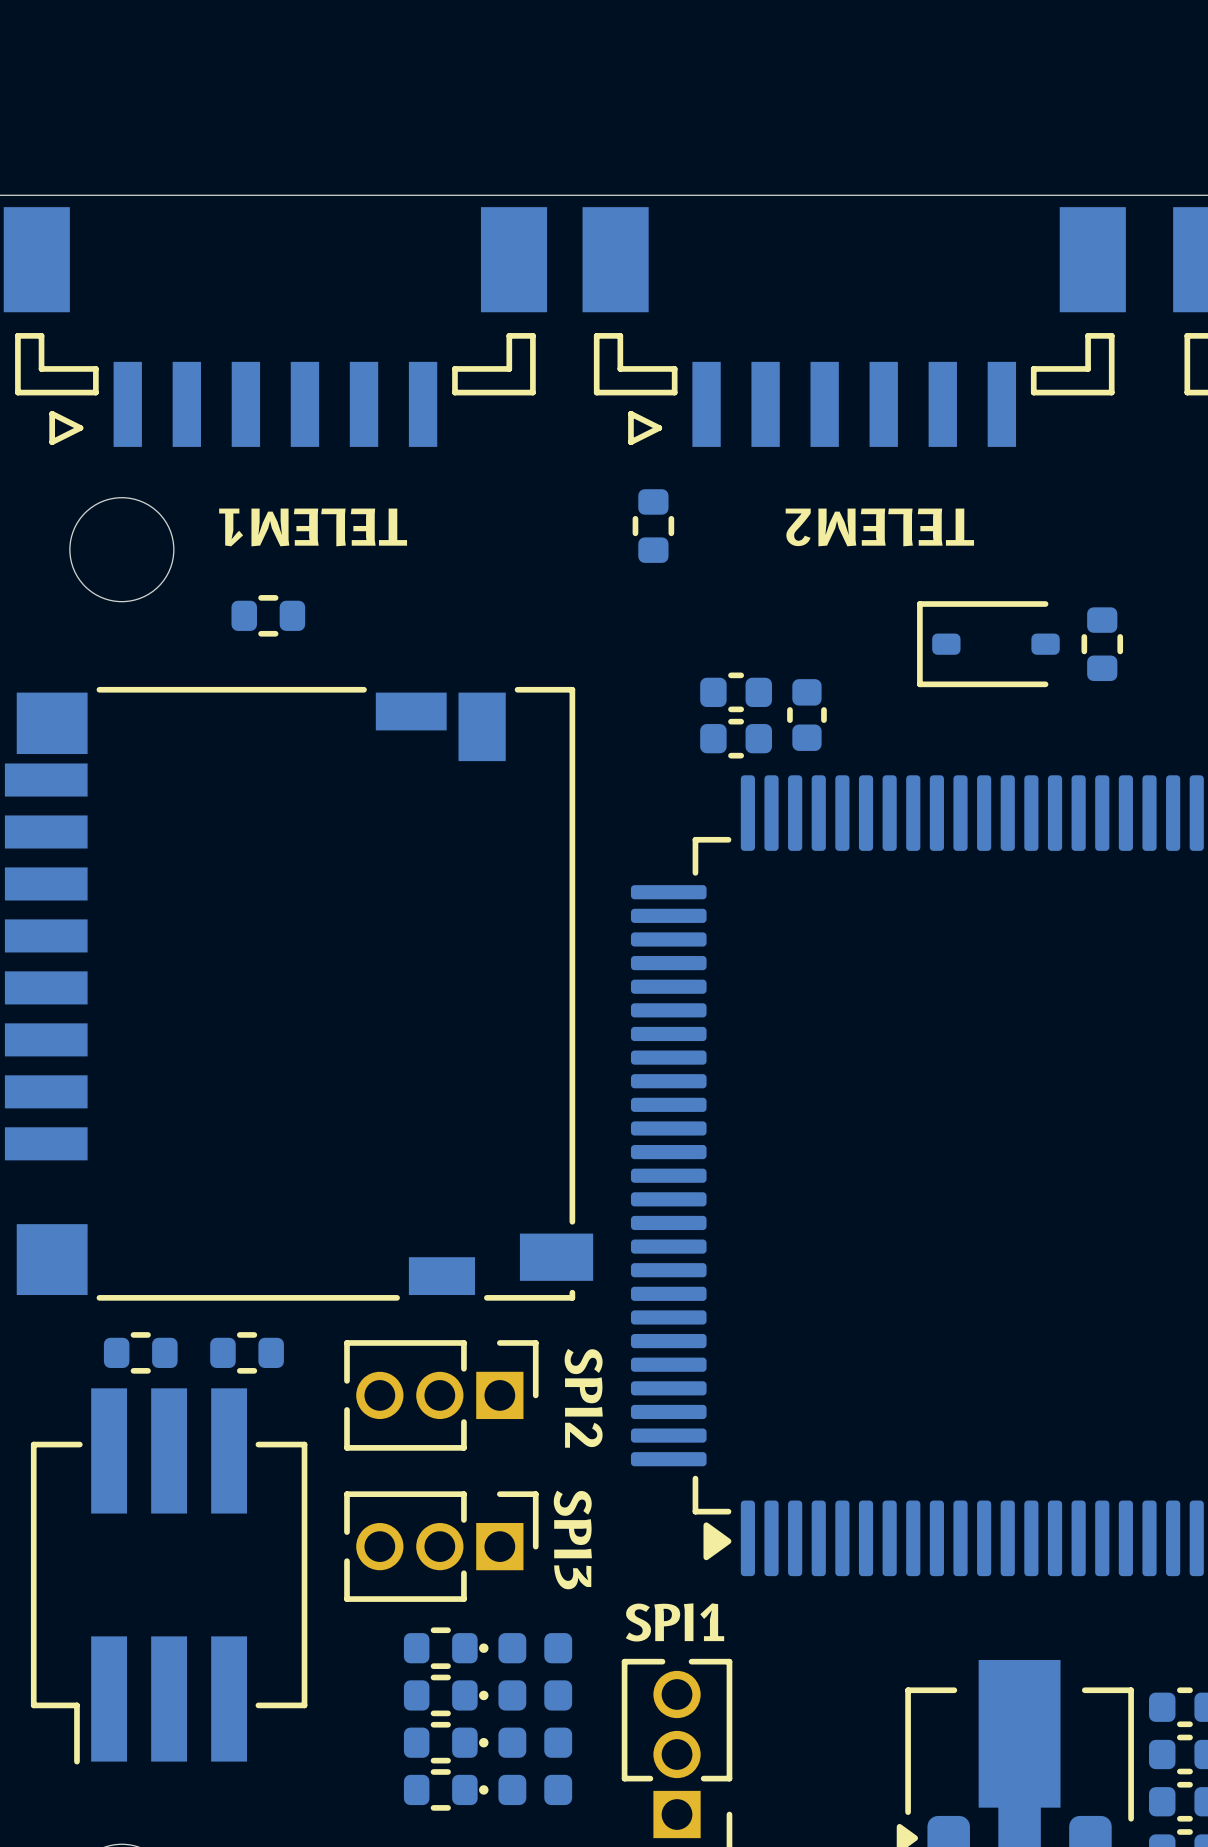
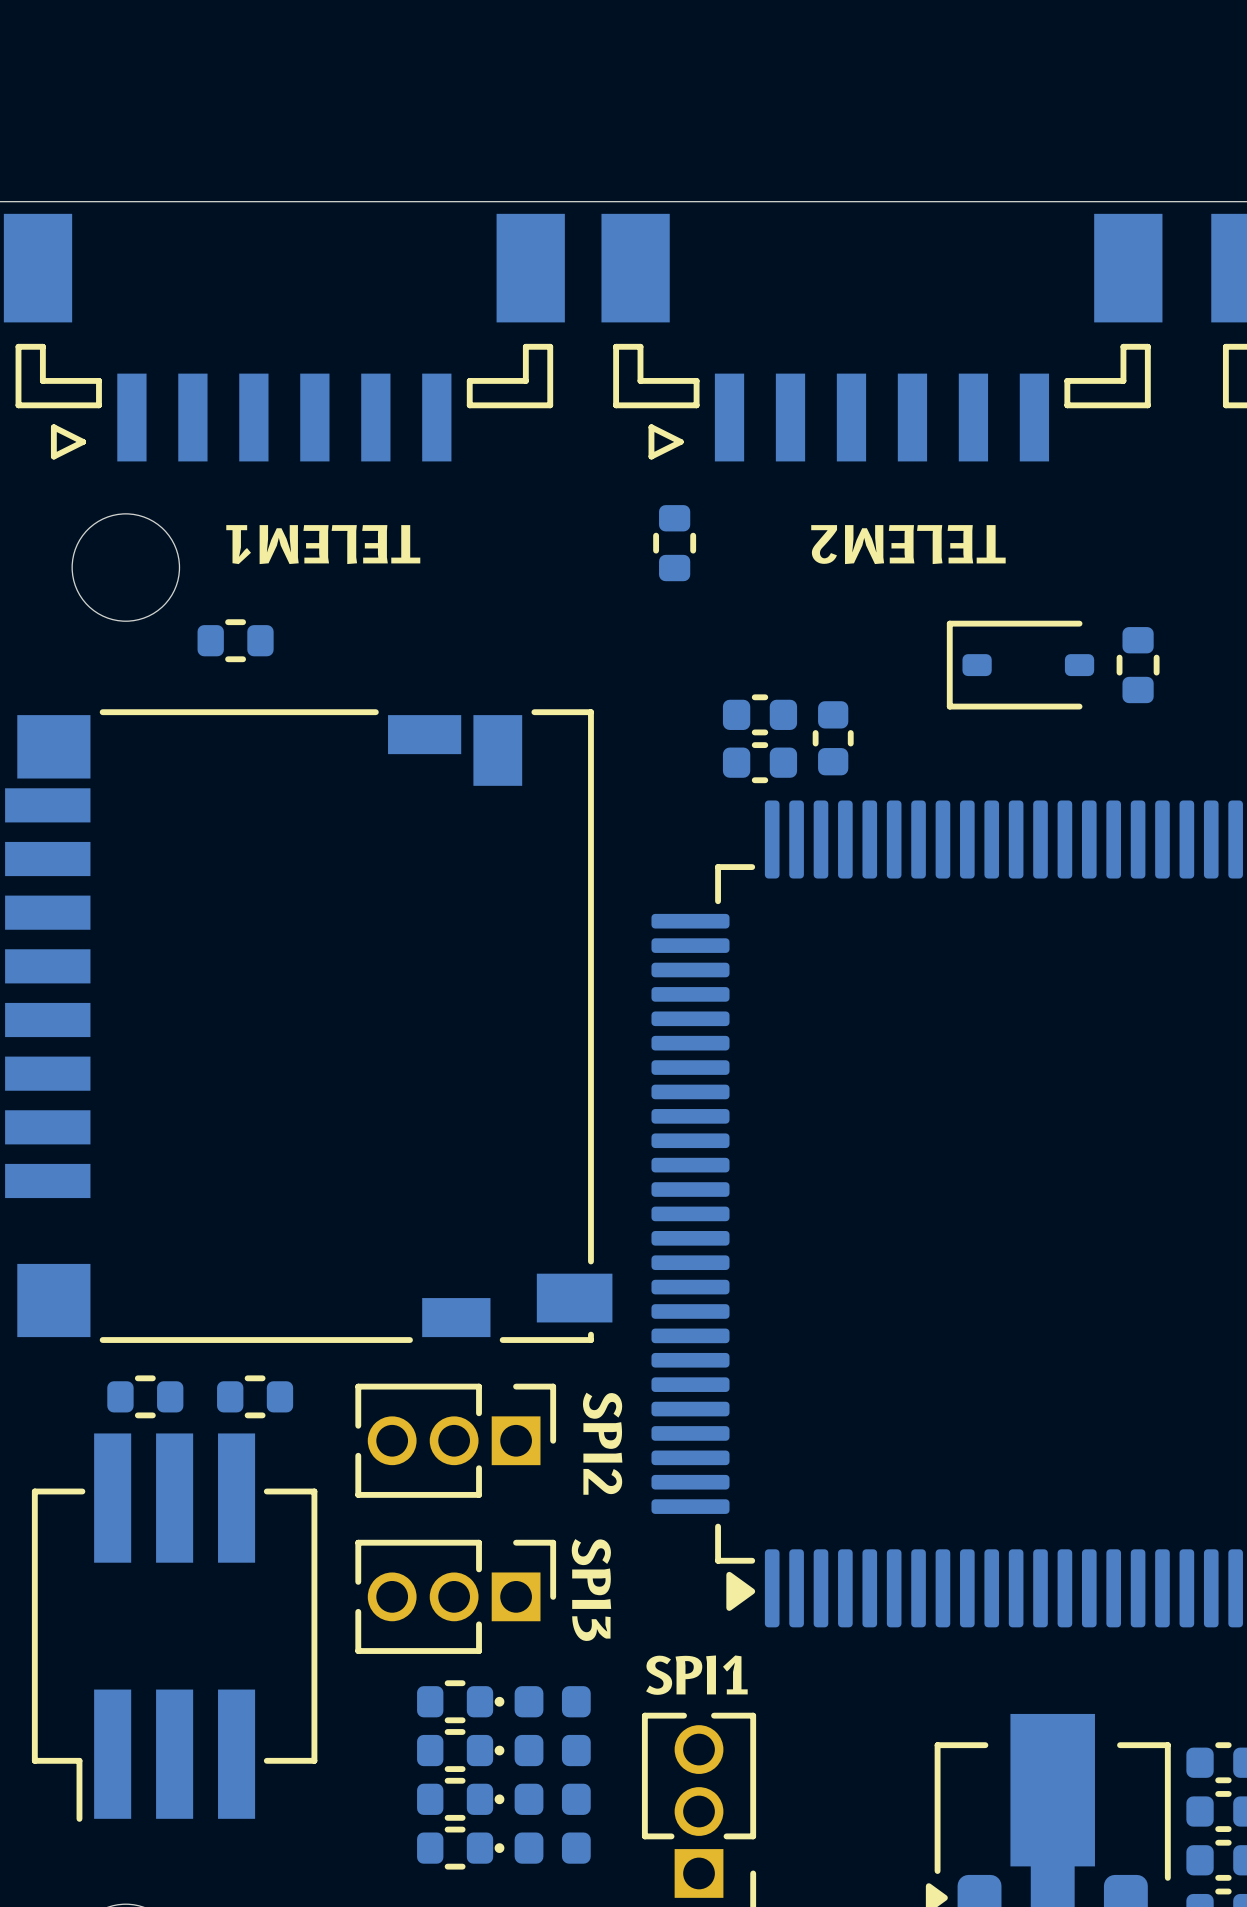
part position: (268, 615) -> (235, 640)

